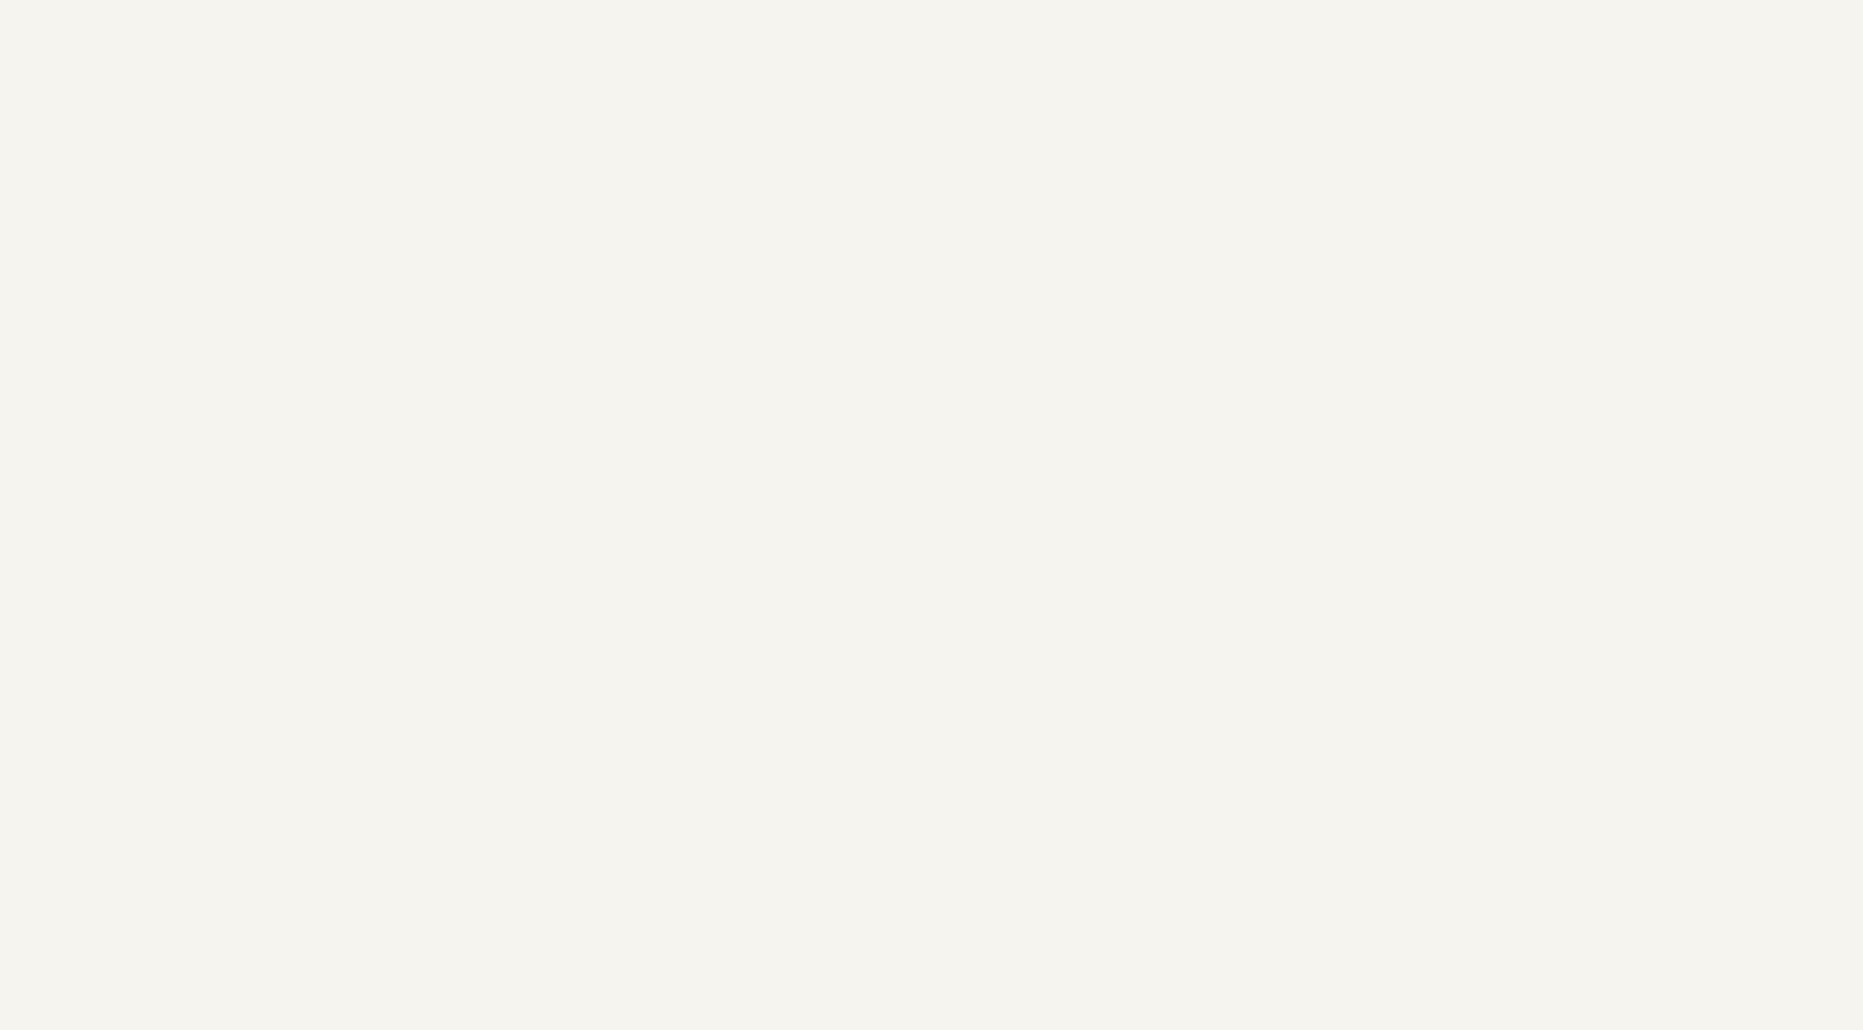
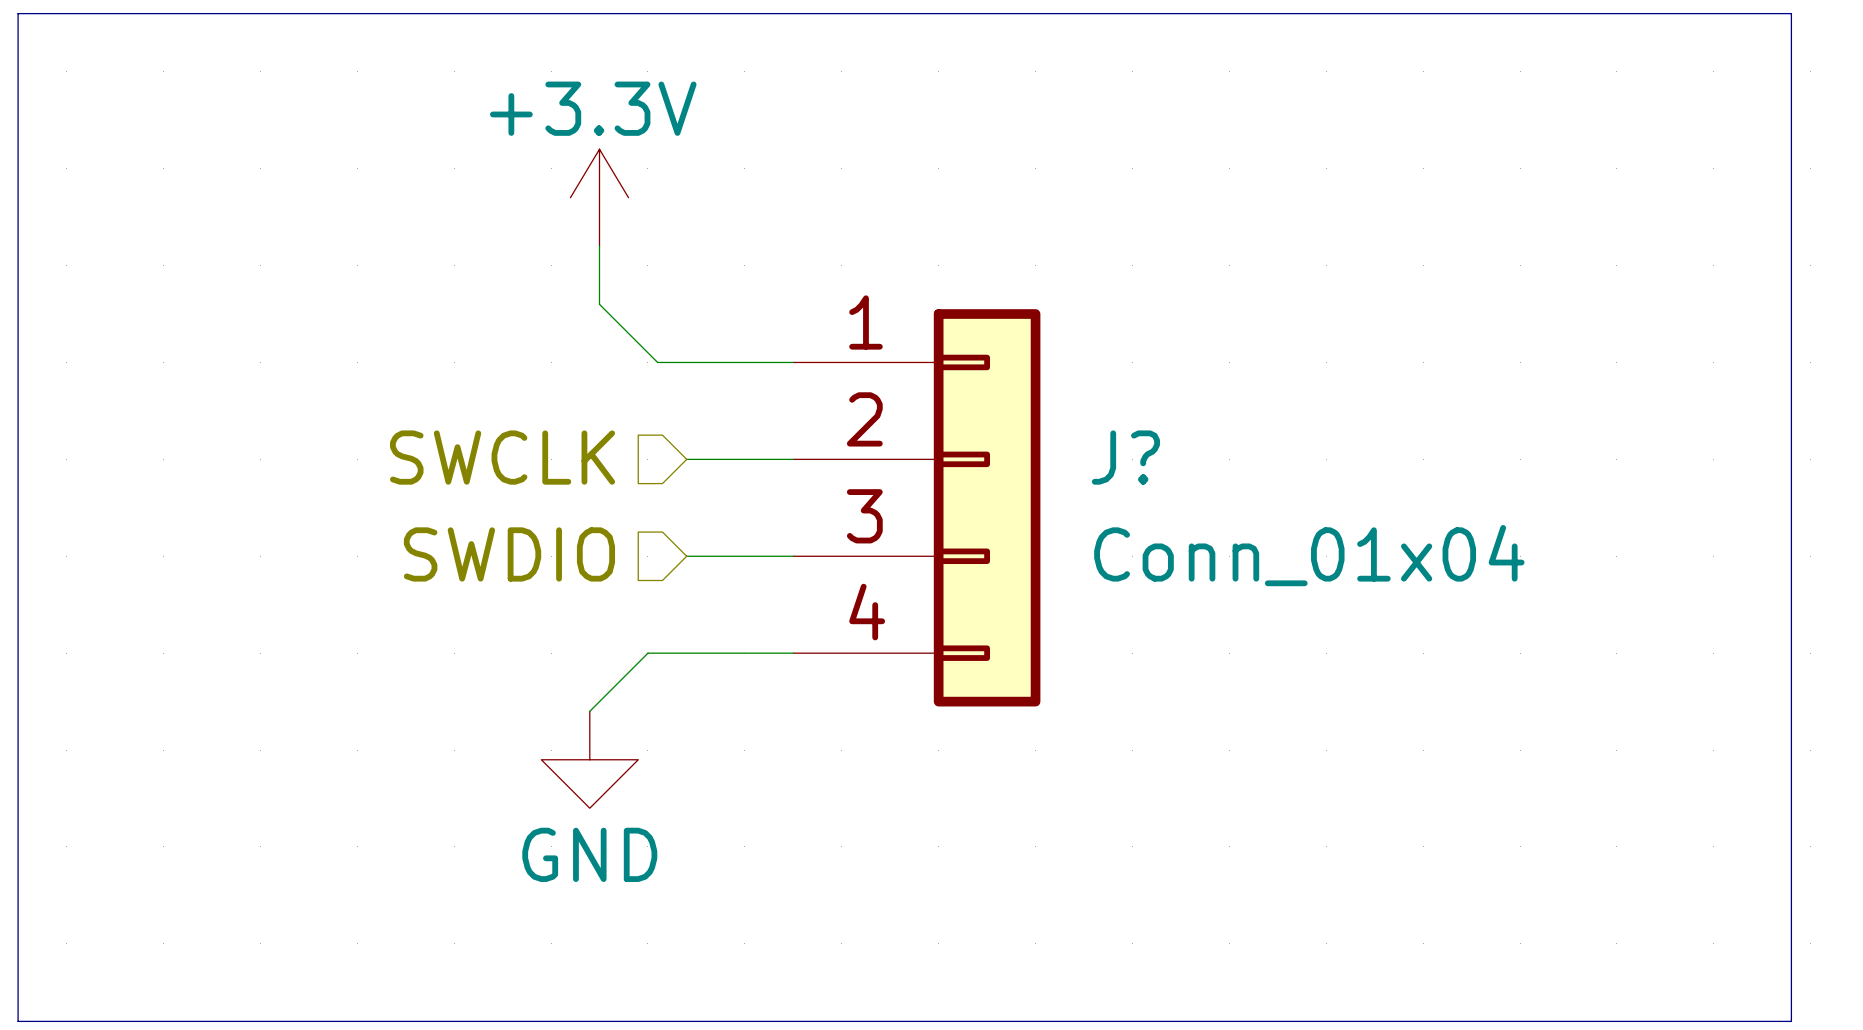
line: none -> (18, 13) (1791, 13) (1791, 1021) (18, 1021) (18, 13)
power symbol: none -> +3.3V (599, 197)
wire: none -> (599, 246) (599, 304) (657, 362) (793, 362)
hierarchical label: none -> SWCLK (502, 457)
wire: none -> (686, 459) (793, 459)
J?: none -> Conn_01x04 (916, 507)
hierarchical label: none -> SWDIO (509, 554)
wire: none -> (686, 556) (793, 556)
wire: none -> (793, 653) (647, 653) (589, 711)
power symbol: none -> GND (589, 759)

